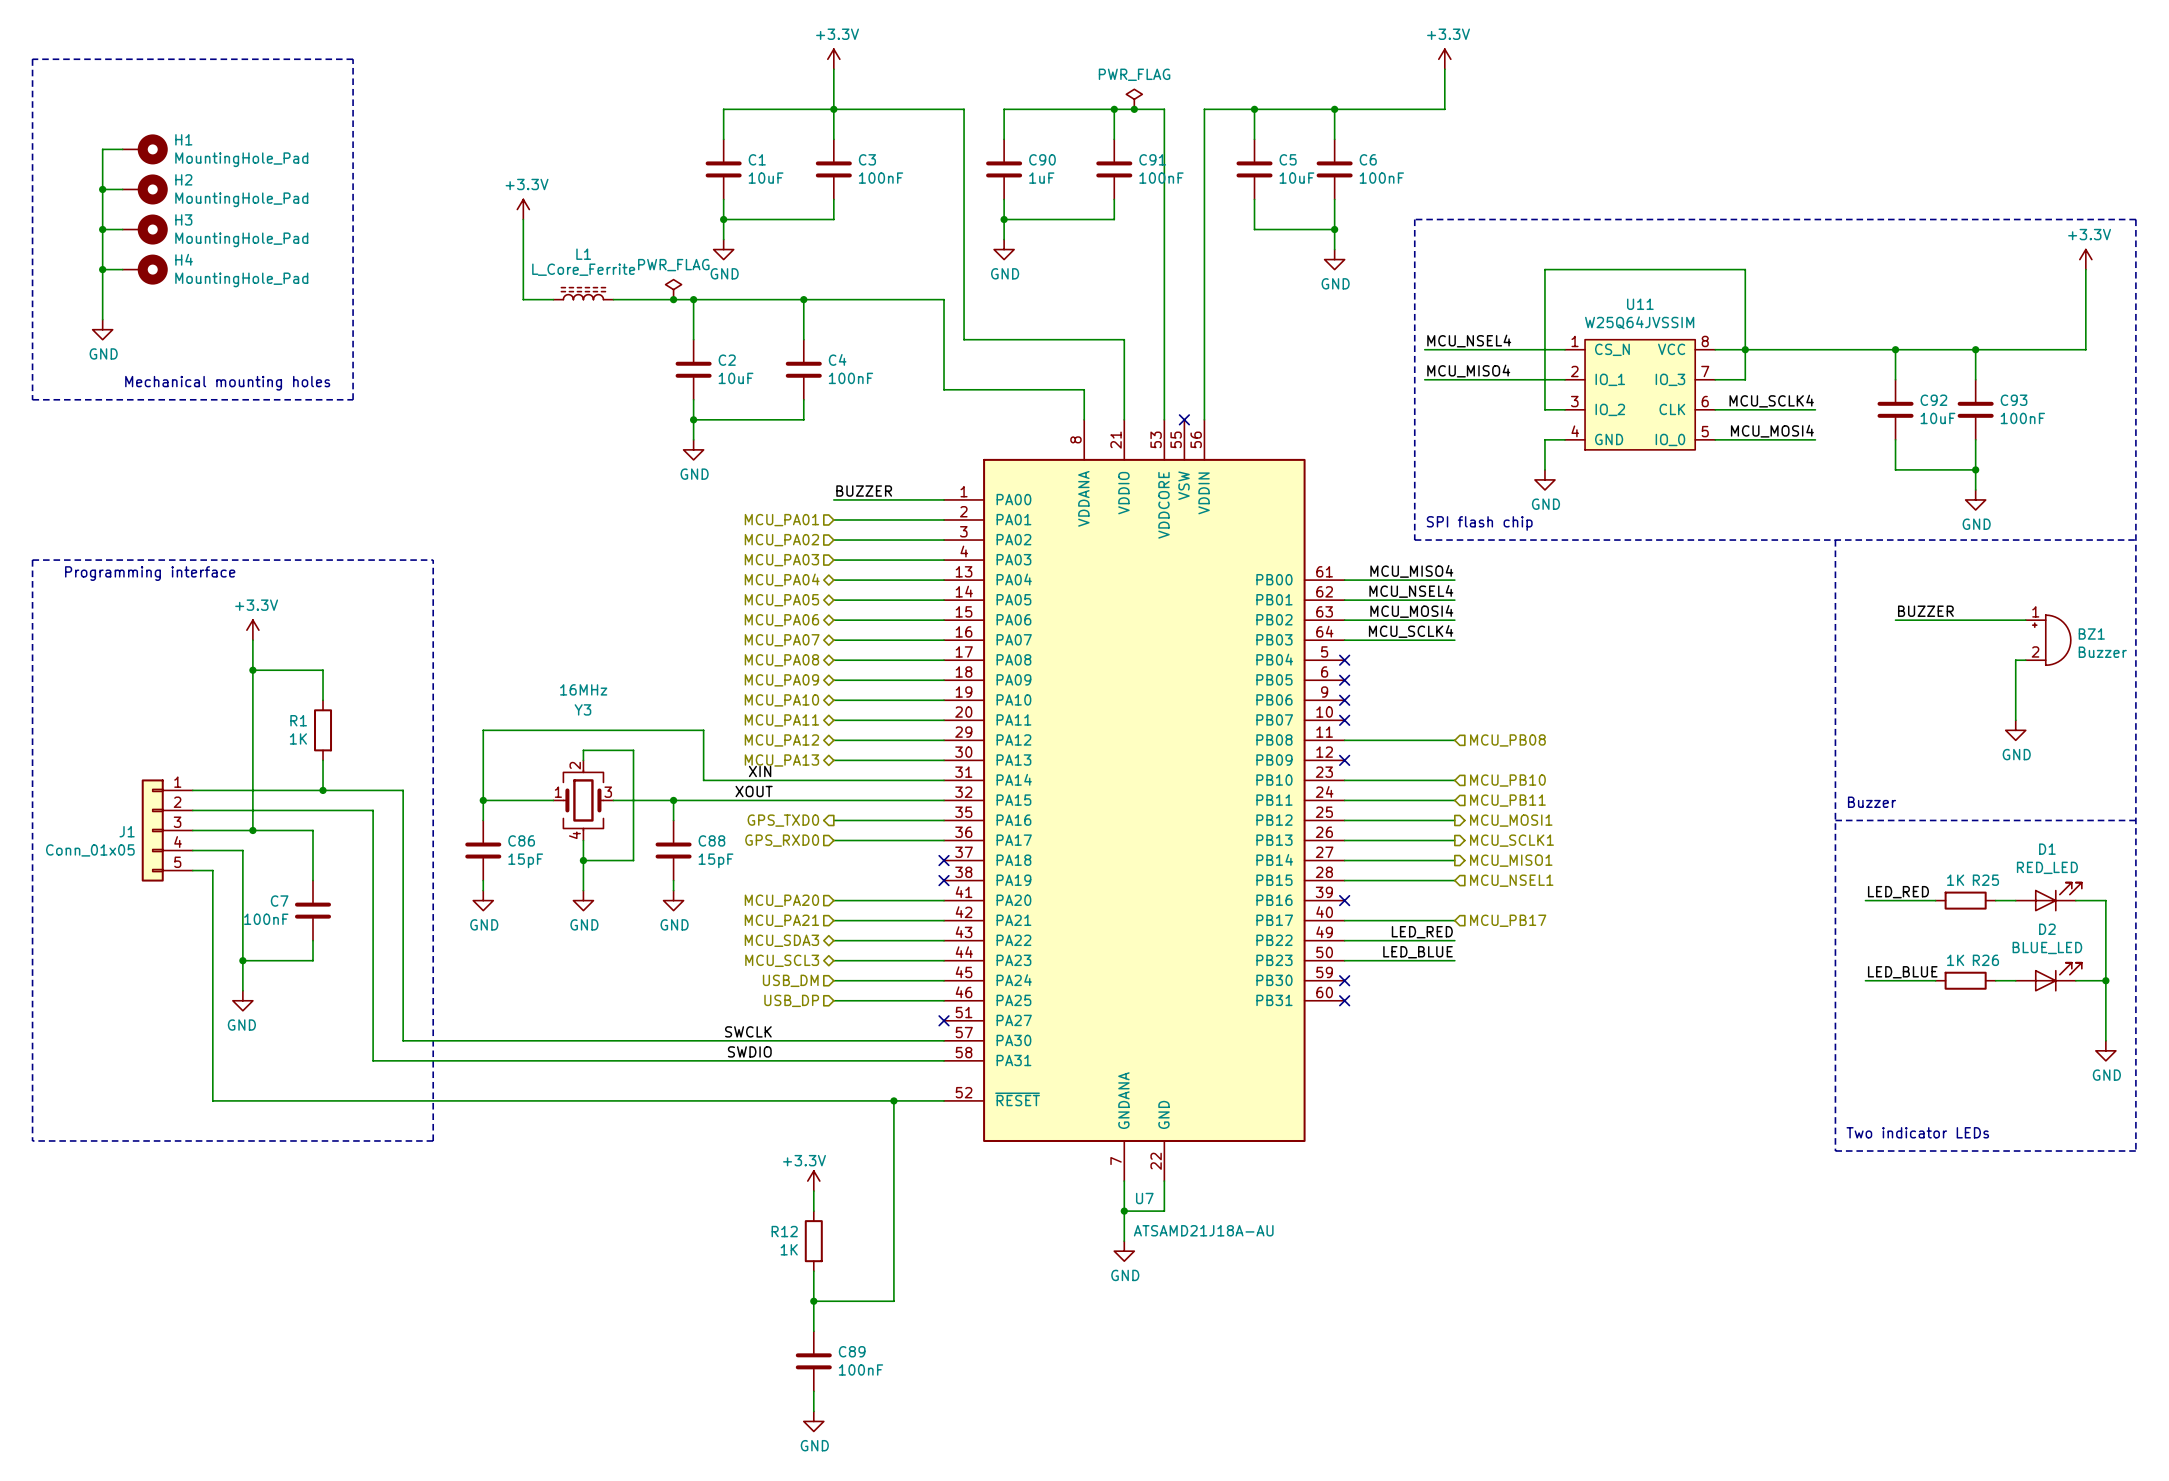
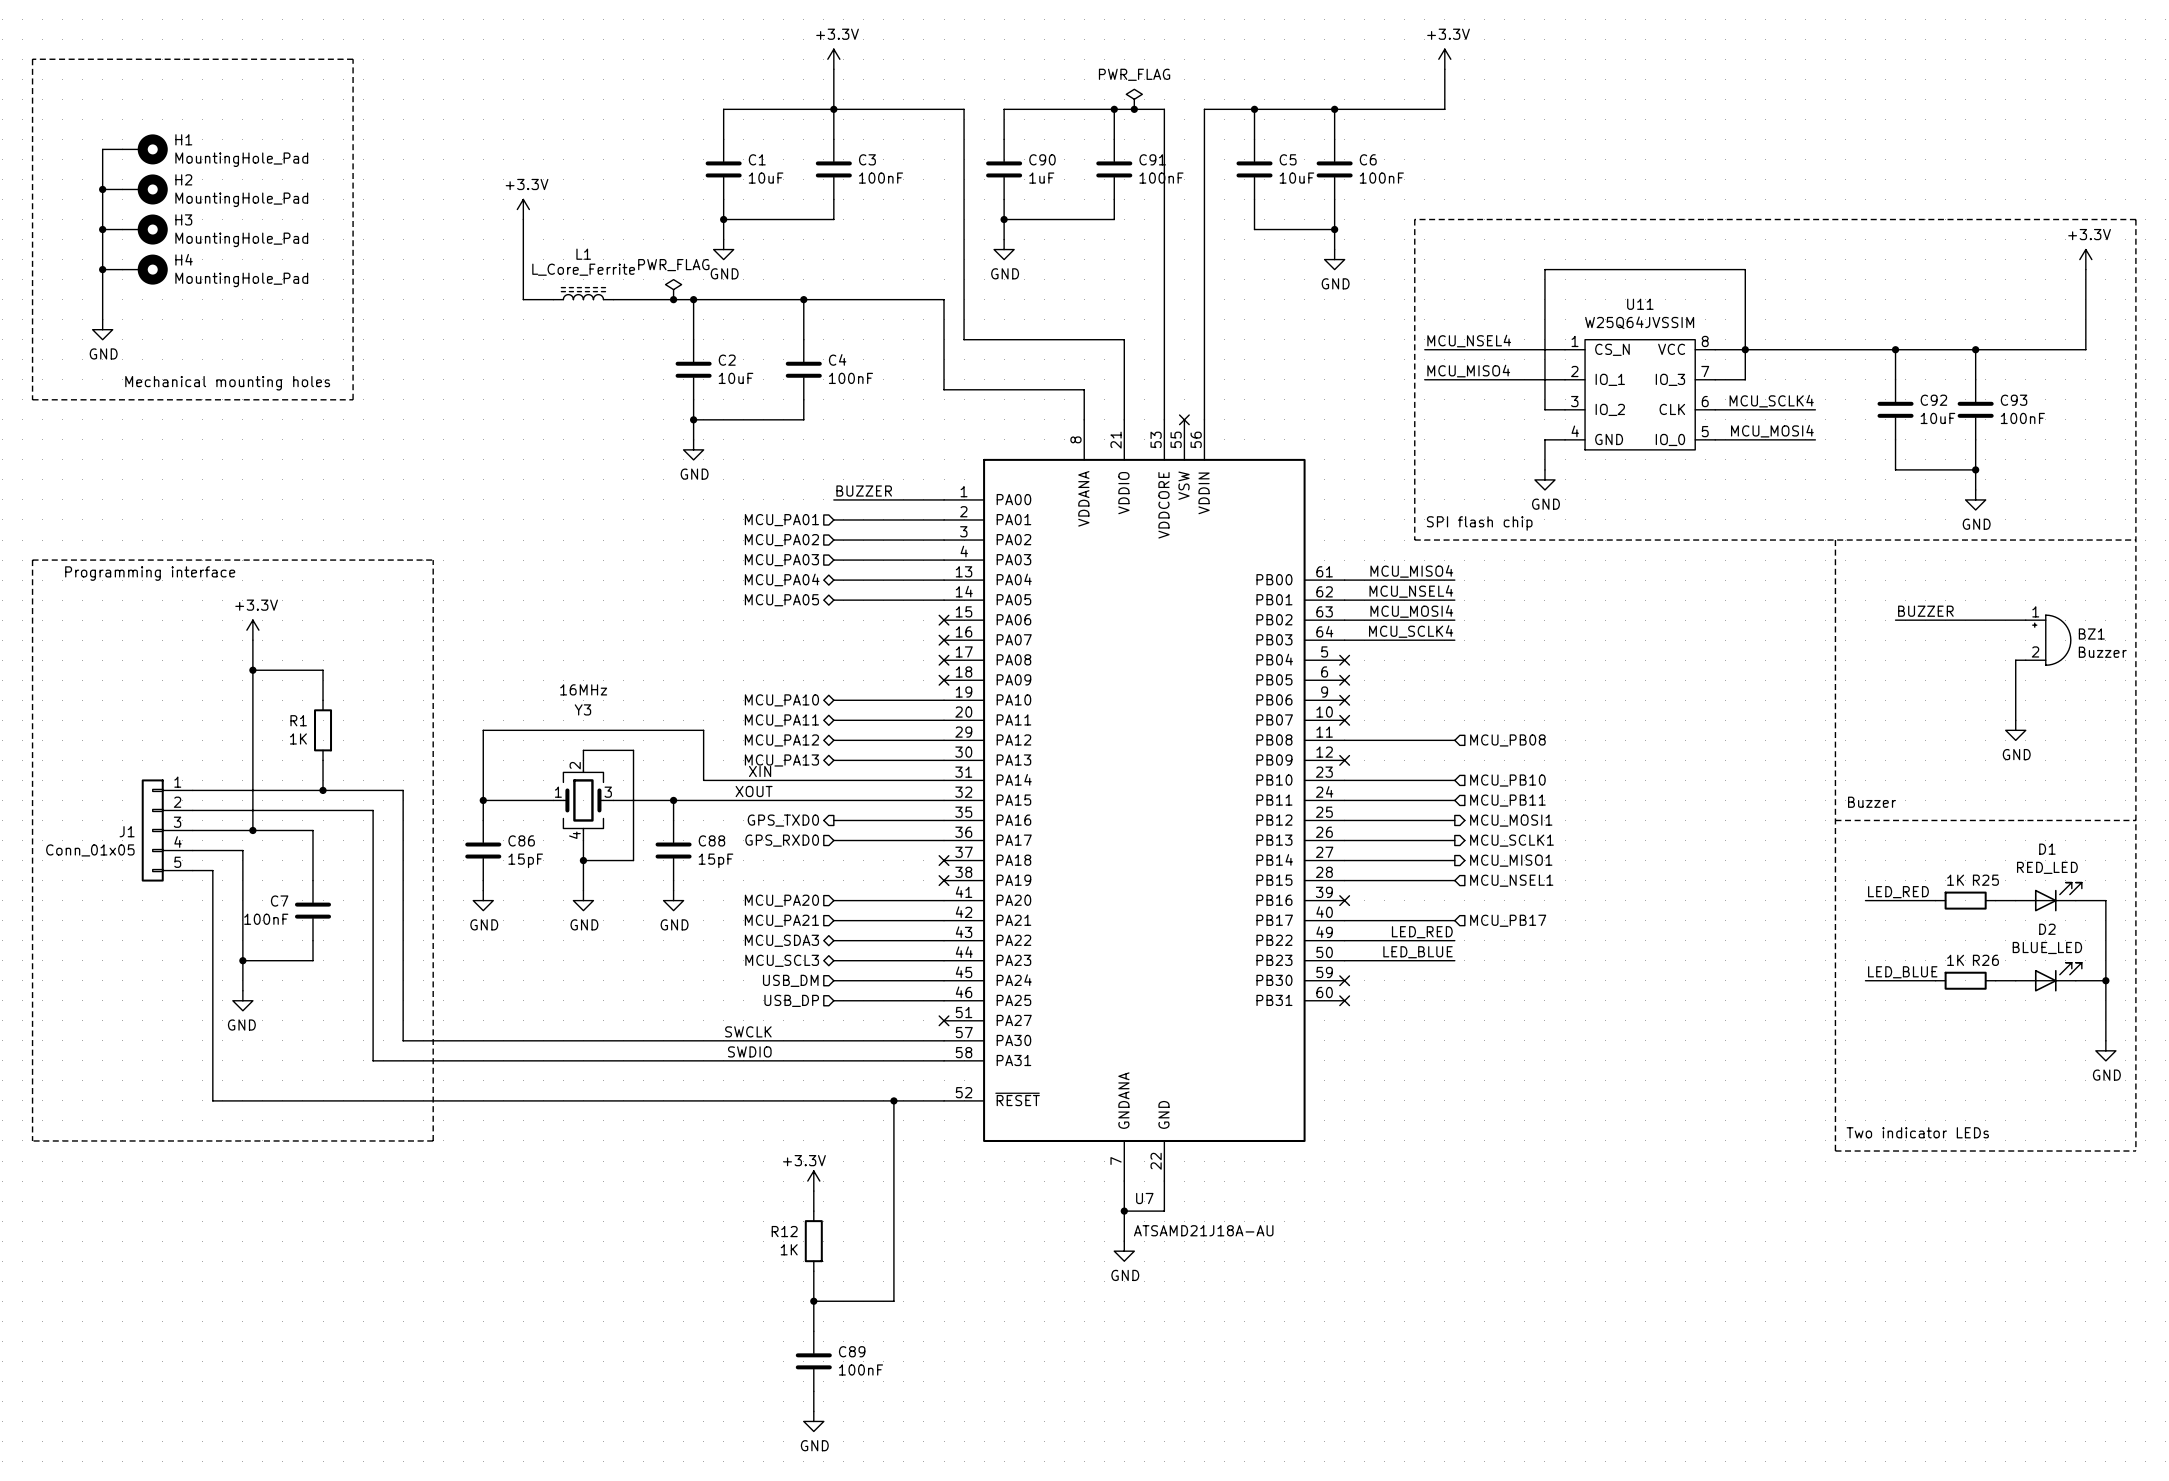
hierarchical label: MCU_PA06 (781, 620) -> none
wire: (833, 620) (944, 620) -> none
no-connect mark: none -> (944, 620)
hierarchical label: MCU_PA07 (782, 640) -> none
wire: (833, 640) (944, 640) -> none
no-connect mark: none -> (944, 640)
hierarchical label: MCU_PA08 (781, 660) -> none
wire: (833, 660) (944, 660) -> none
no-connect mark: none -> (944, 660)
hierarchical label: MCU_PA09 (781, 680) -> none
wire: (833, 680) (944, 680) -> none
no-connect mark: none -> (944, 680)

